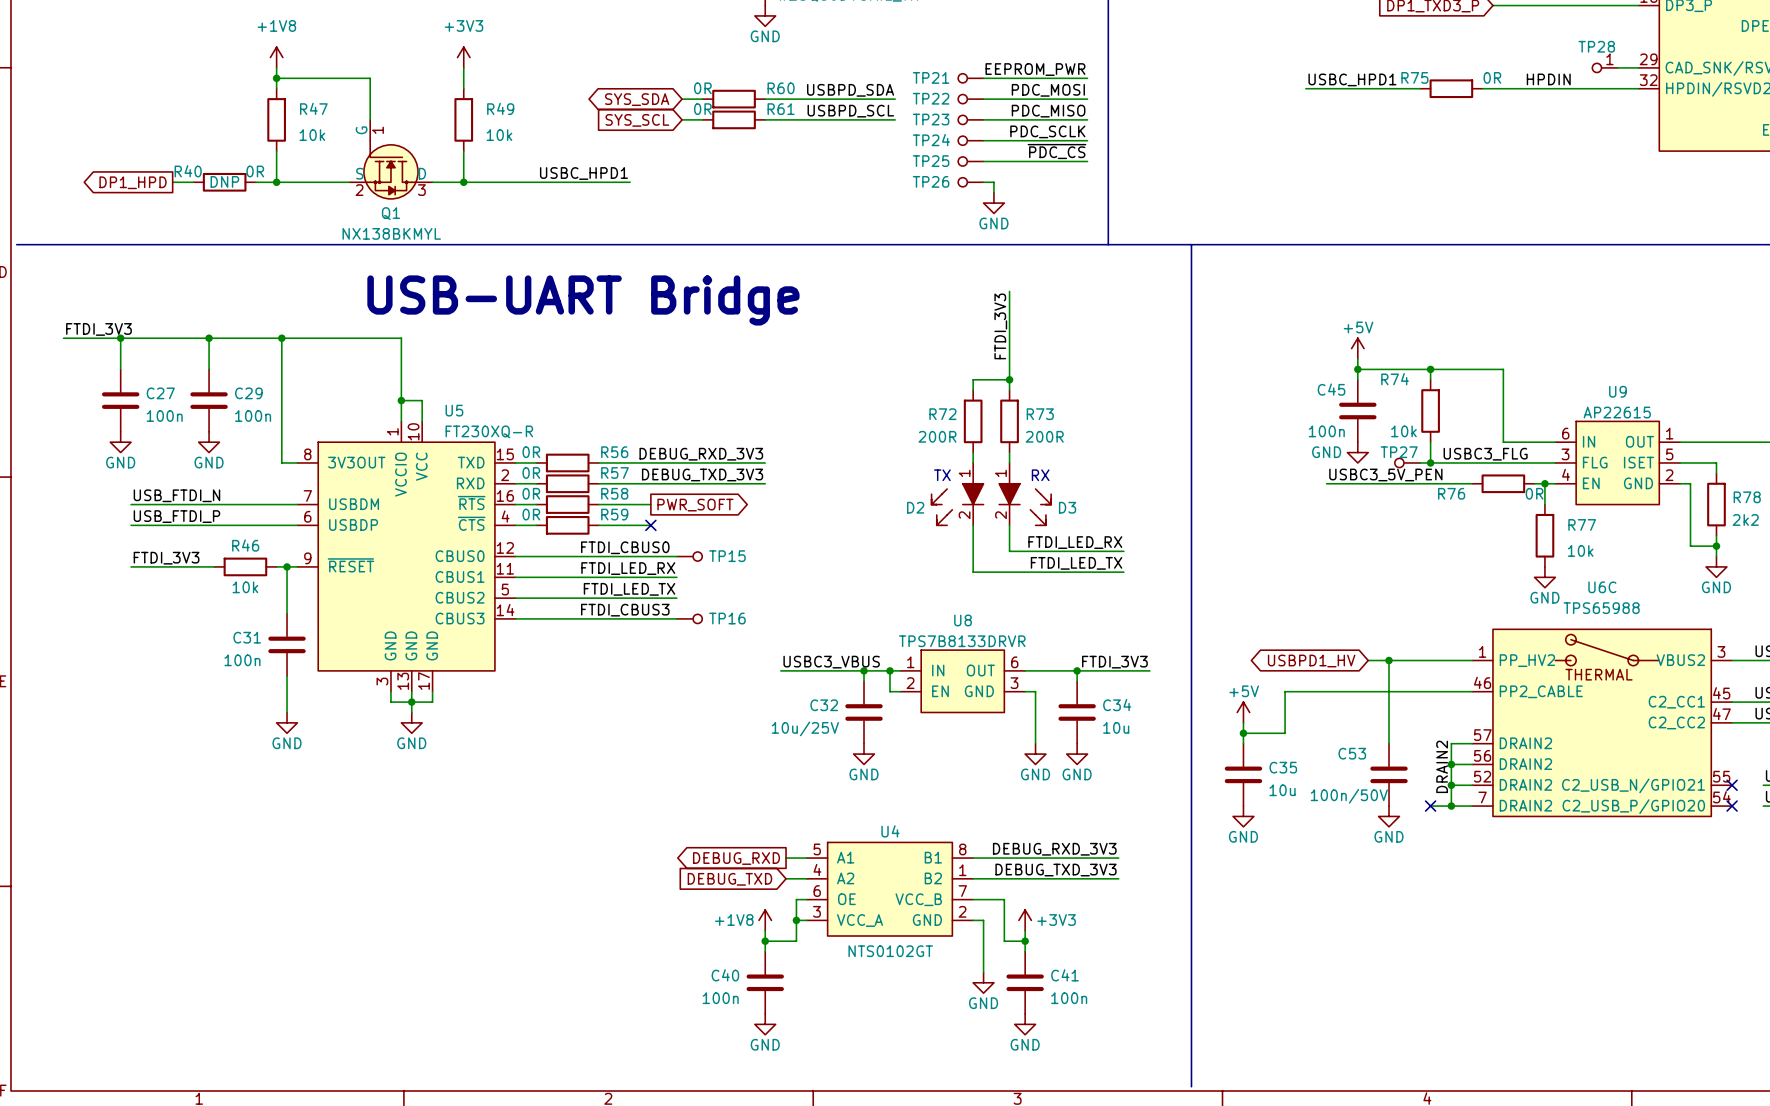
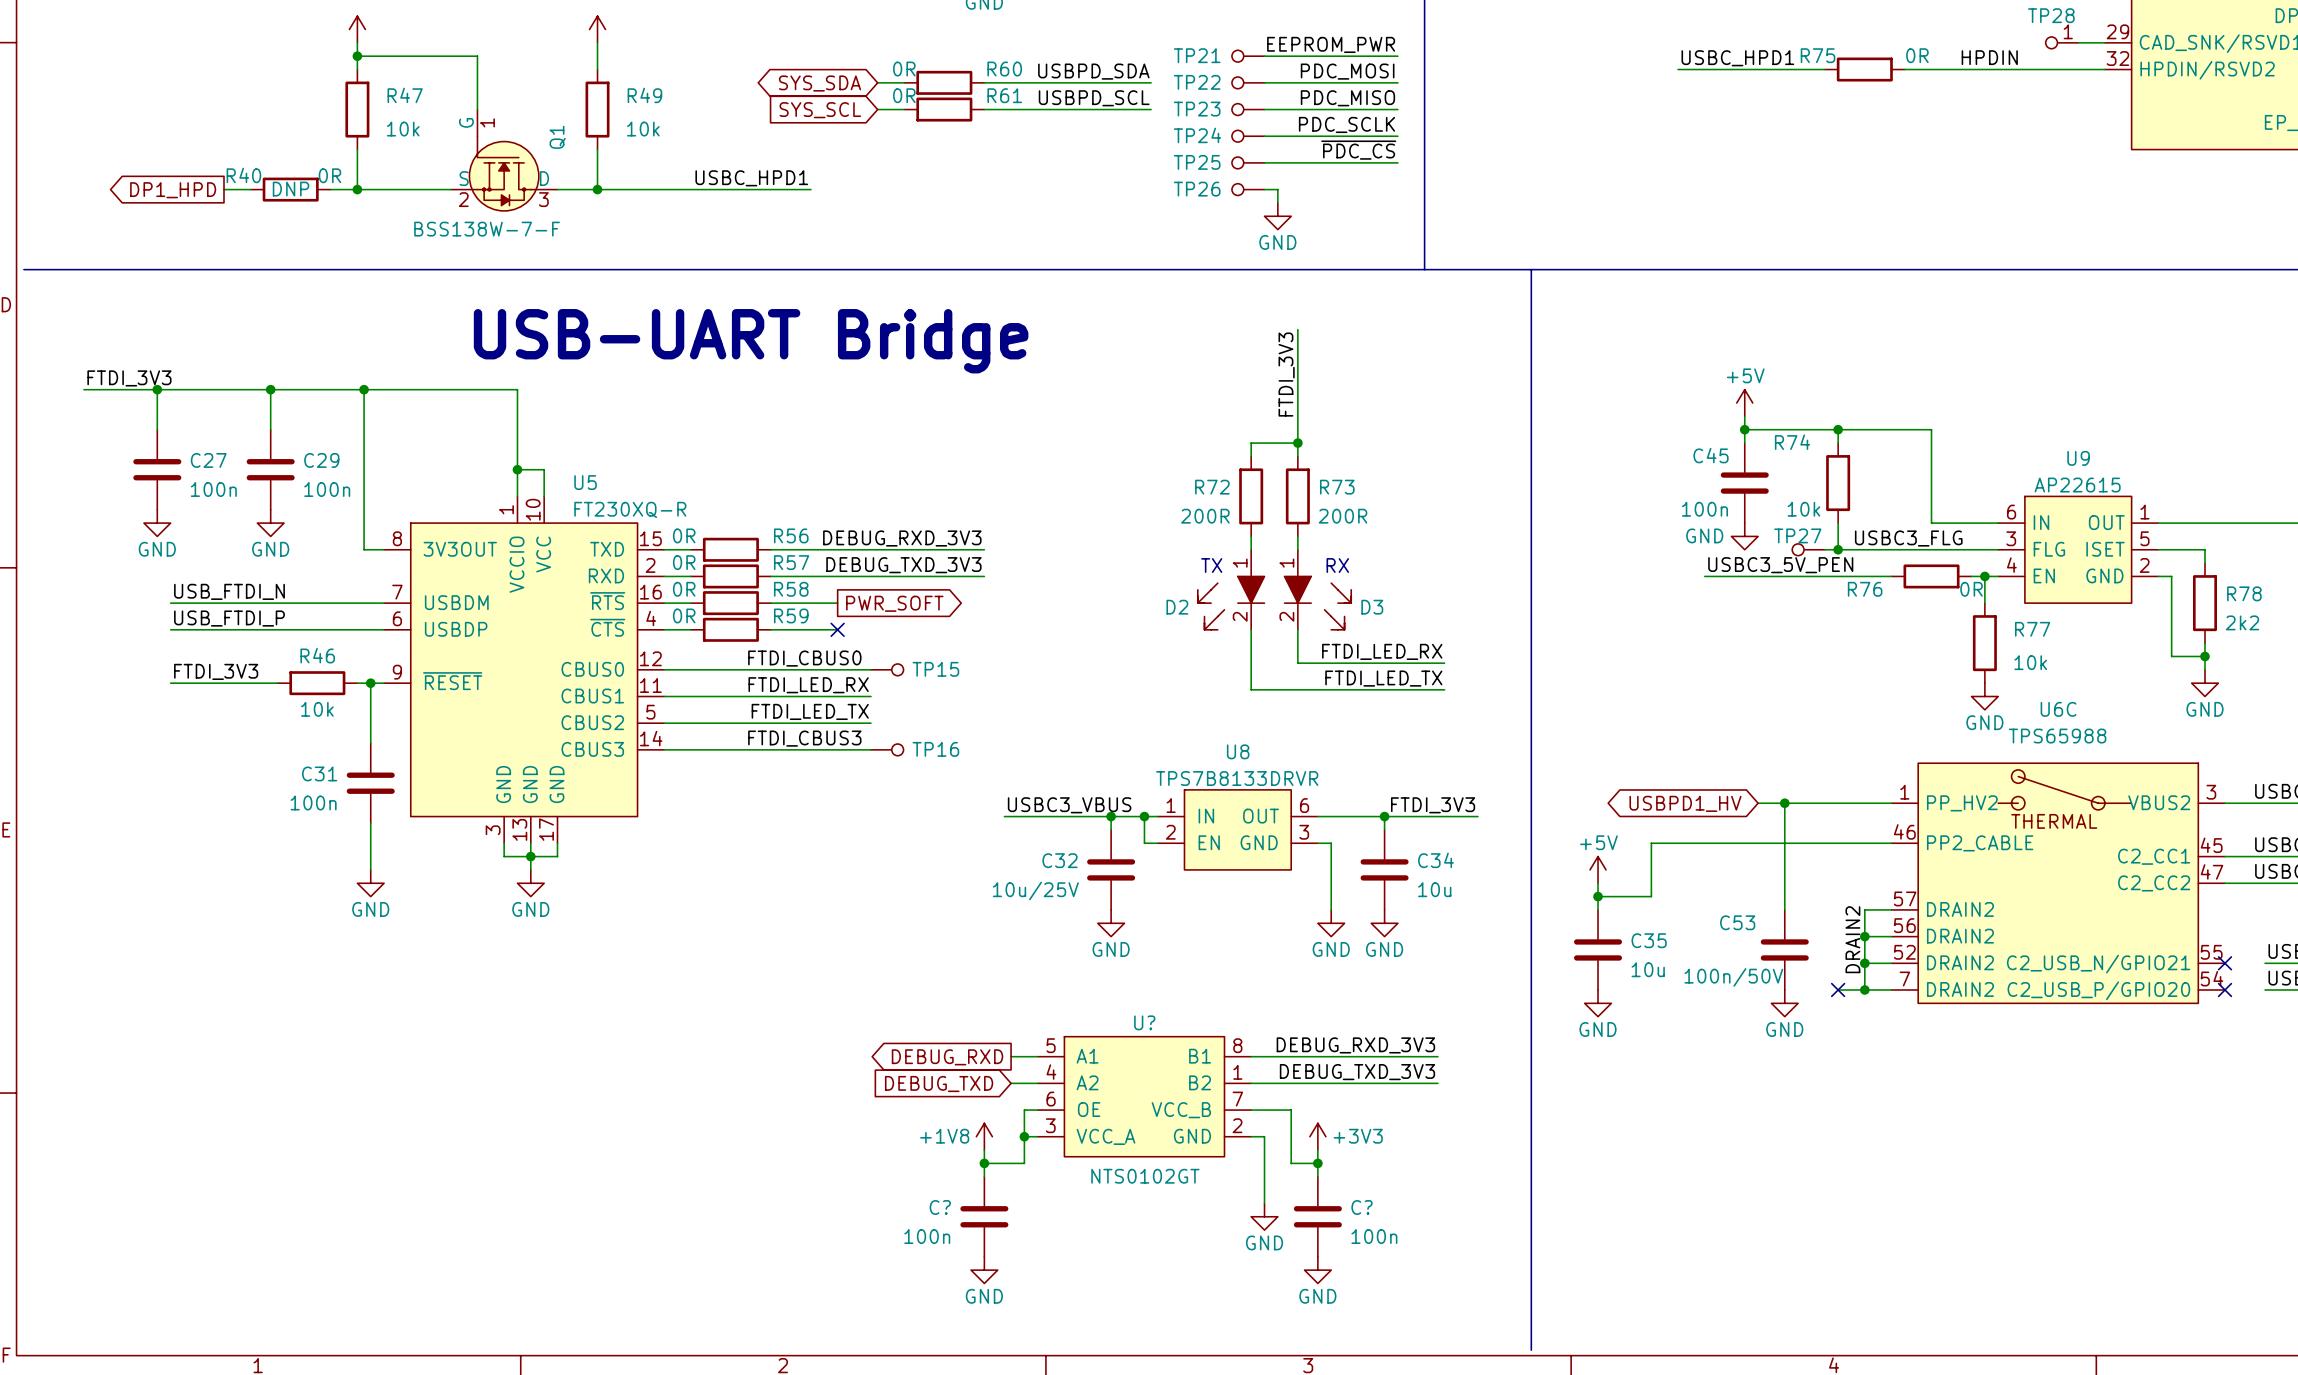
Q1 name rotation: 0° (390, 213) -> 90° counterclockwise (557, 137)
Q1 name position: Q1 (390, 213) -> Q1 (557, 137)
Q1 value: NX138BKMYL (391, 233) -> BSS138W-7-F (487, 229)
U4 name: U4 (890, 831) -> U? (1144, 1022)
C40 name: C40 (725, 975) -> C? (940, 1207)
C41 name: C41 (1064, 975) -> C? (1362, 1207)

